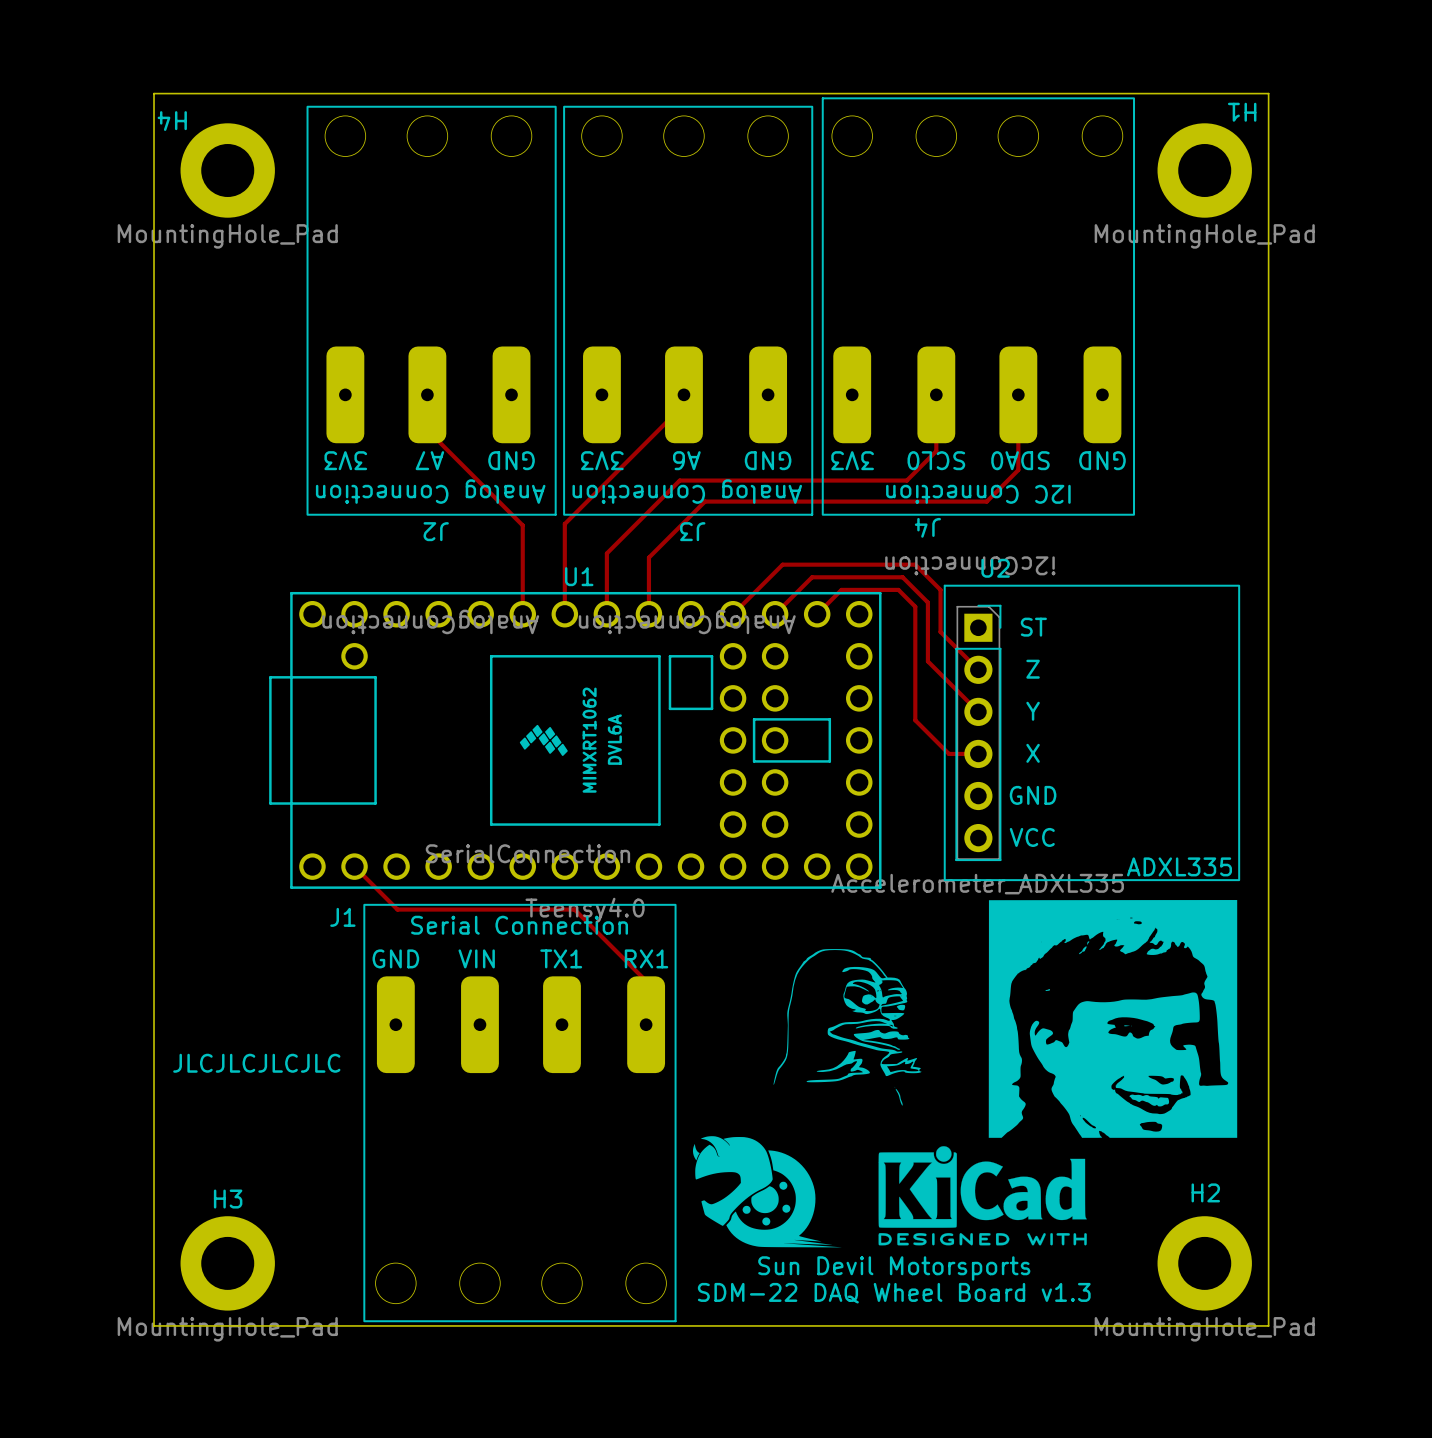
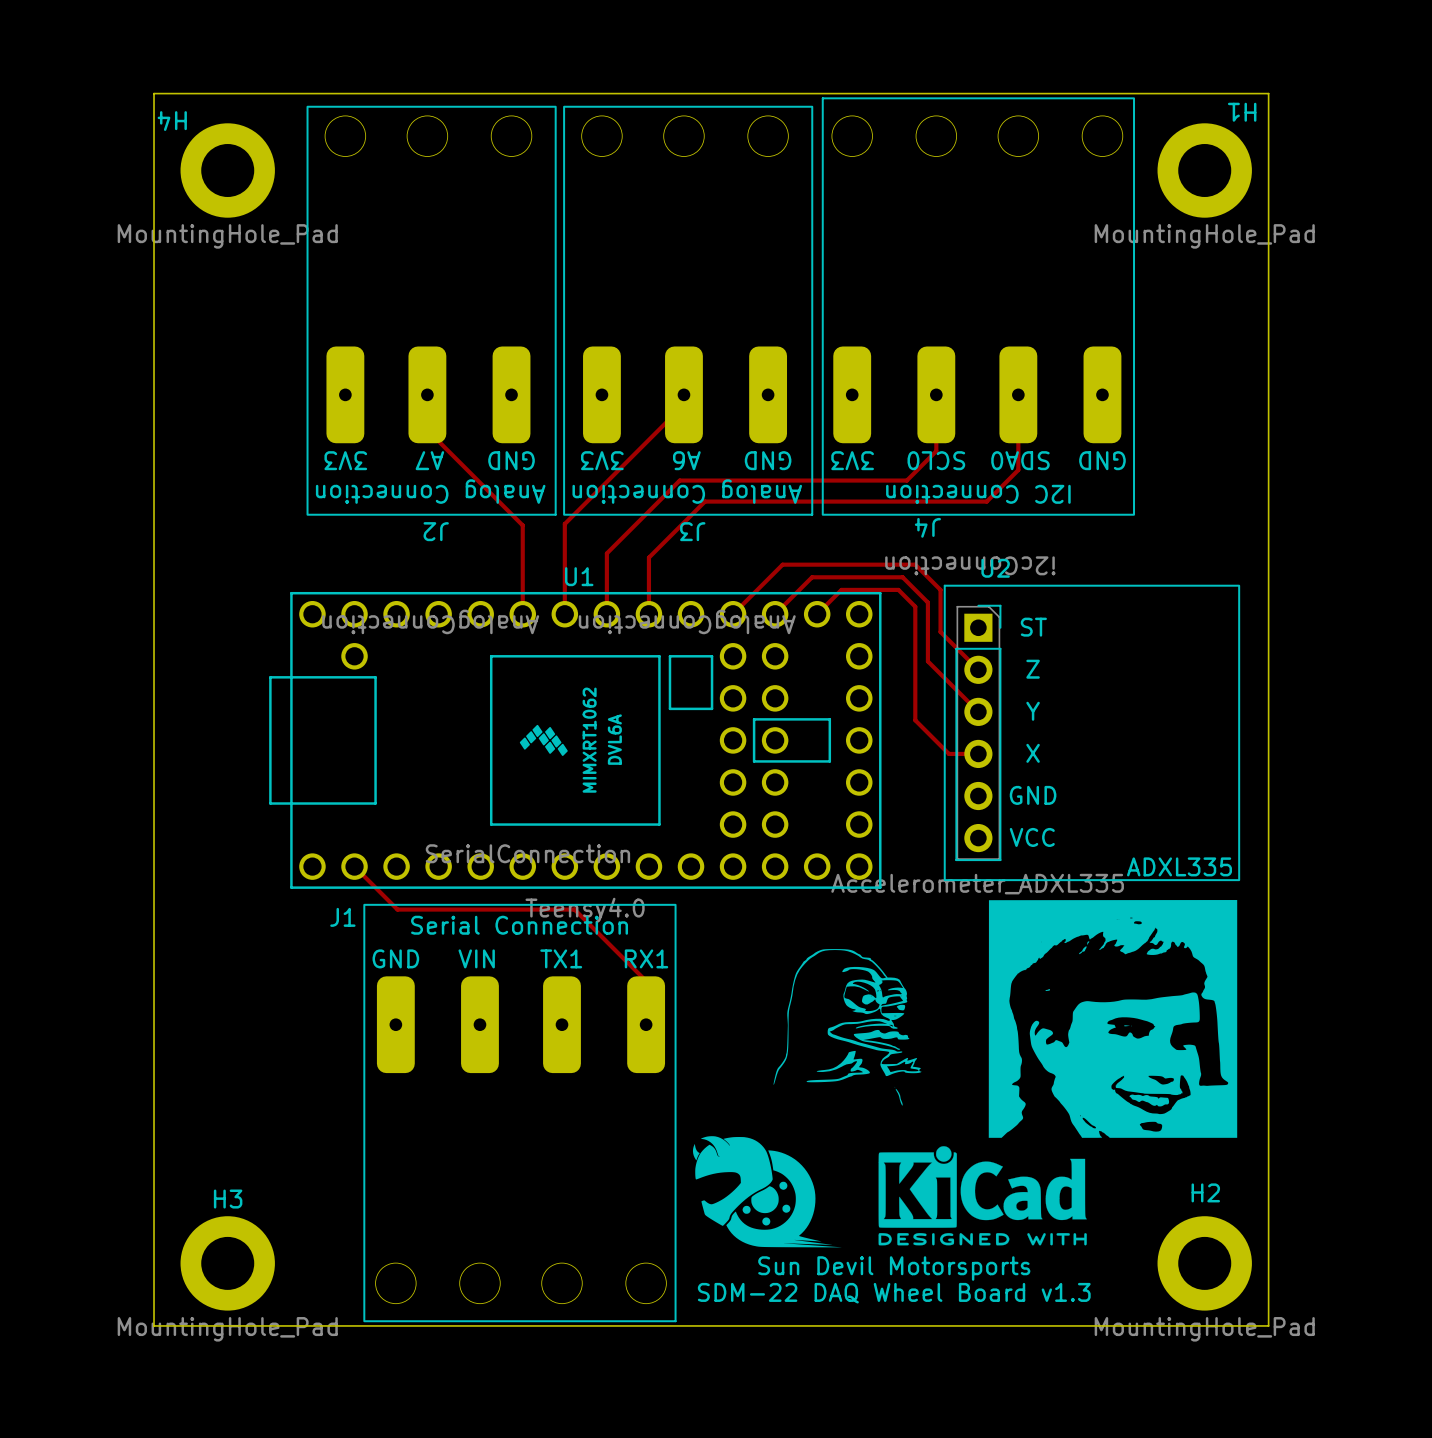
text: JLCJLCJLCJLC (256, 1063) -> none

